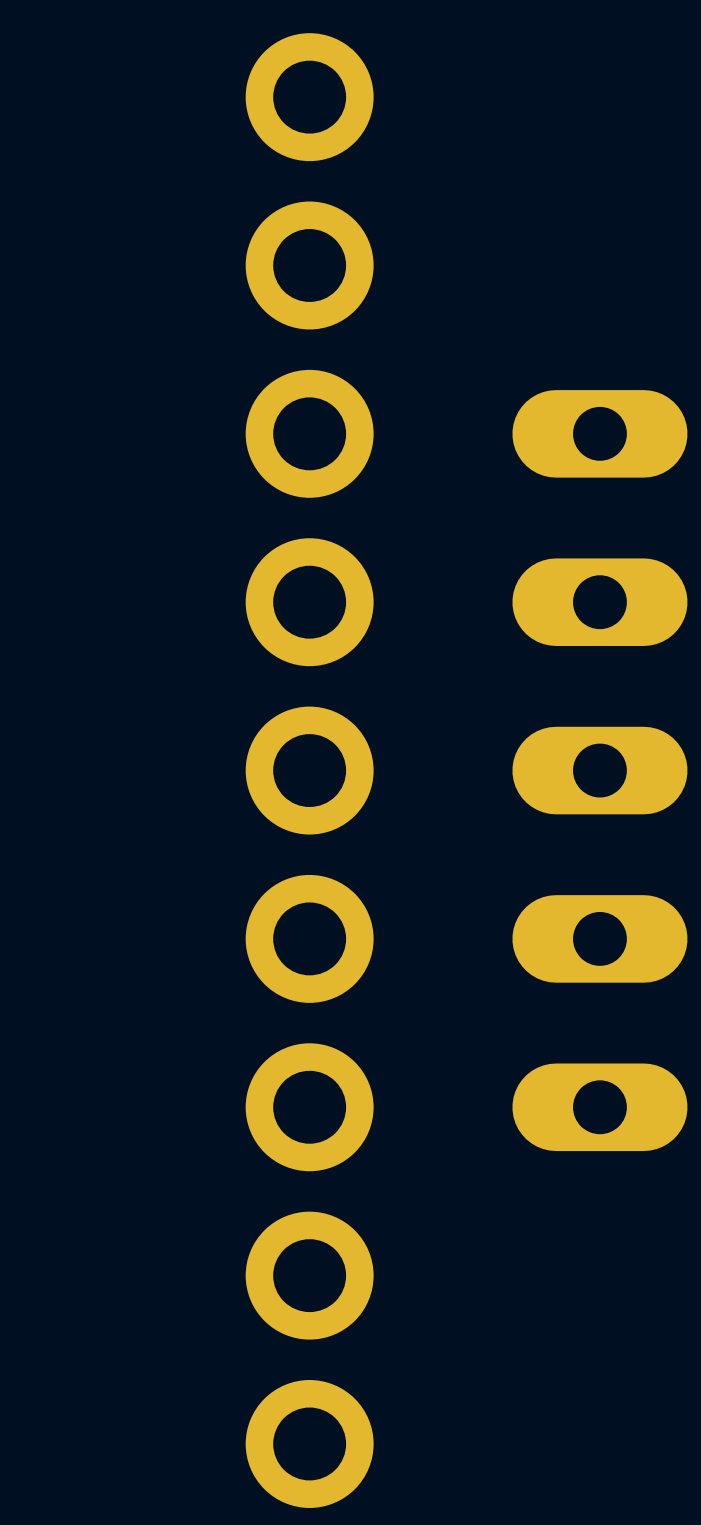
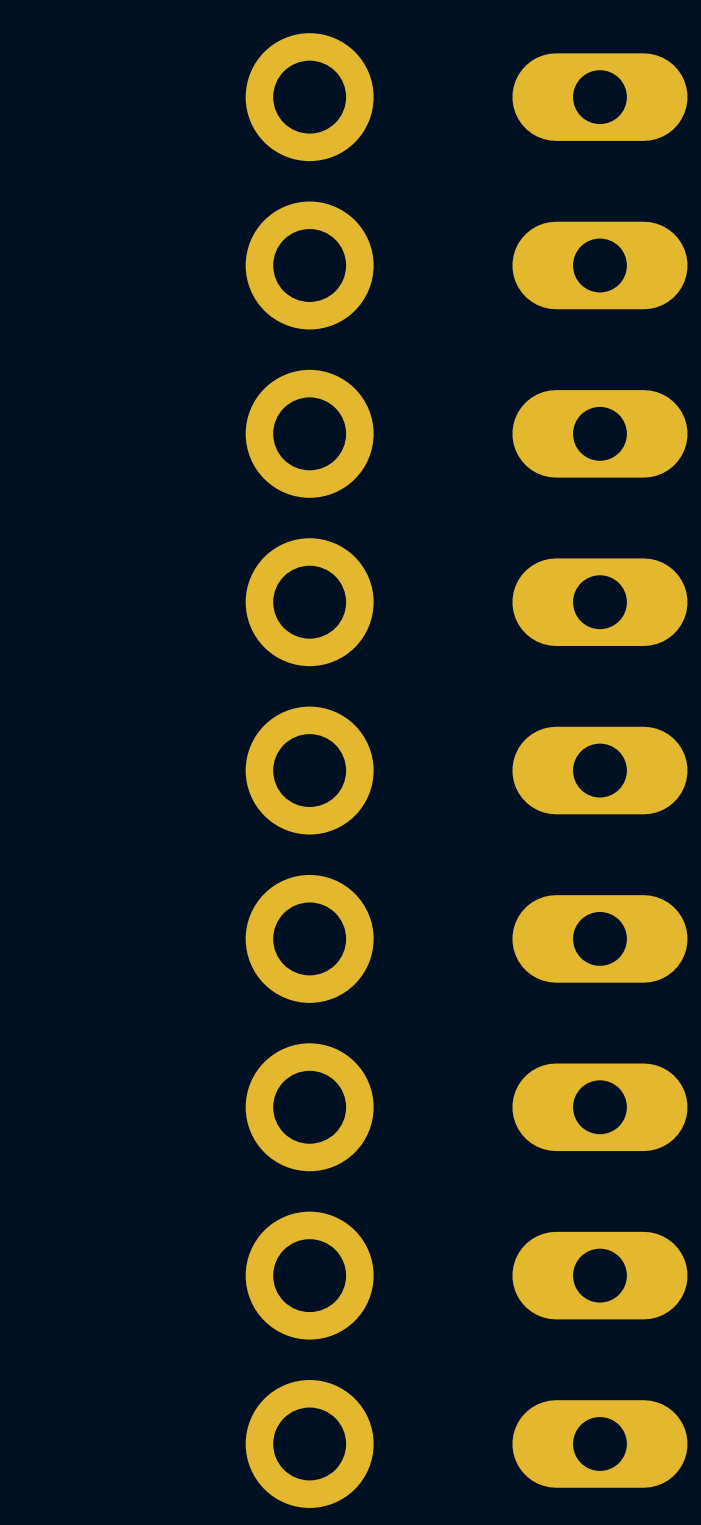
part footprint: [512, 390, 688, 1152] -> [512, 53, 688, 1488]

